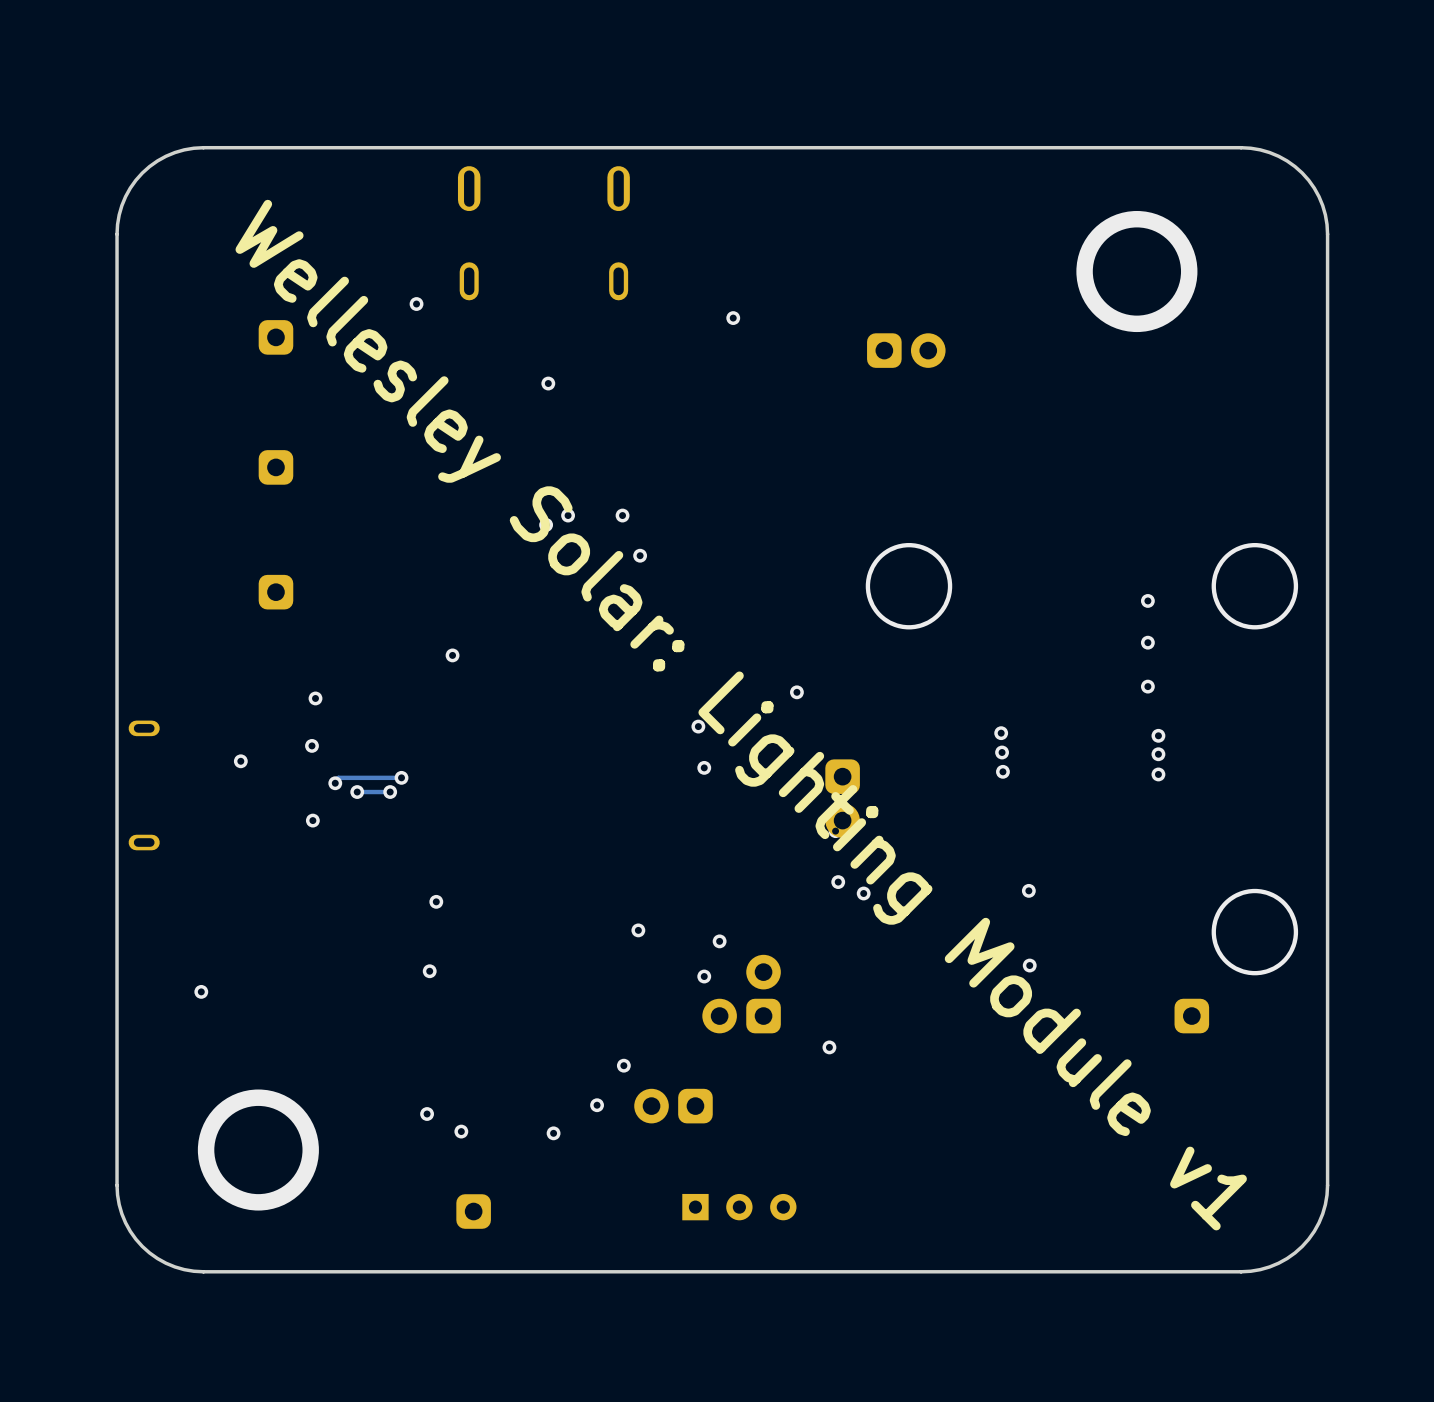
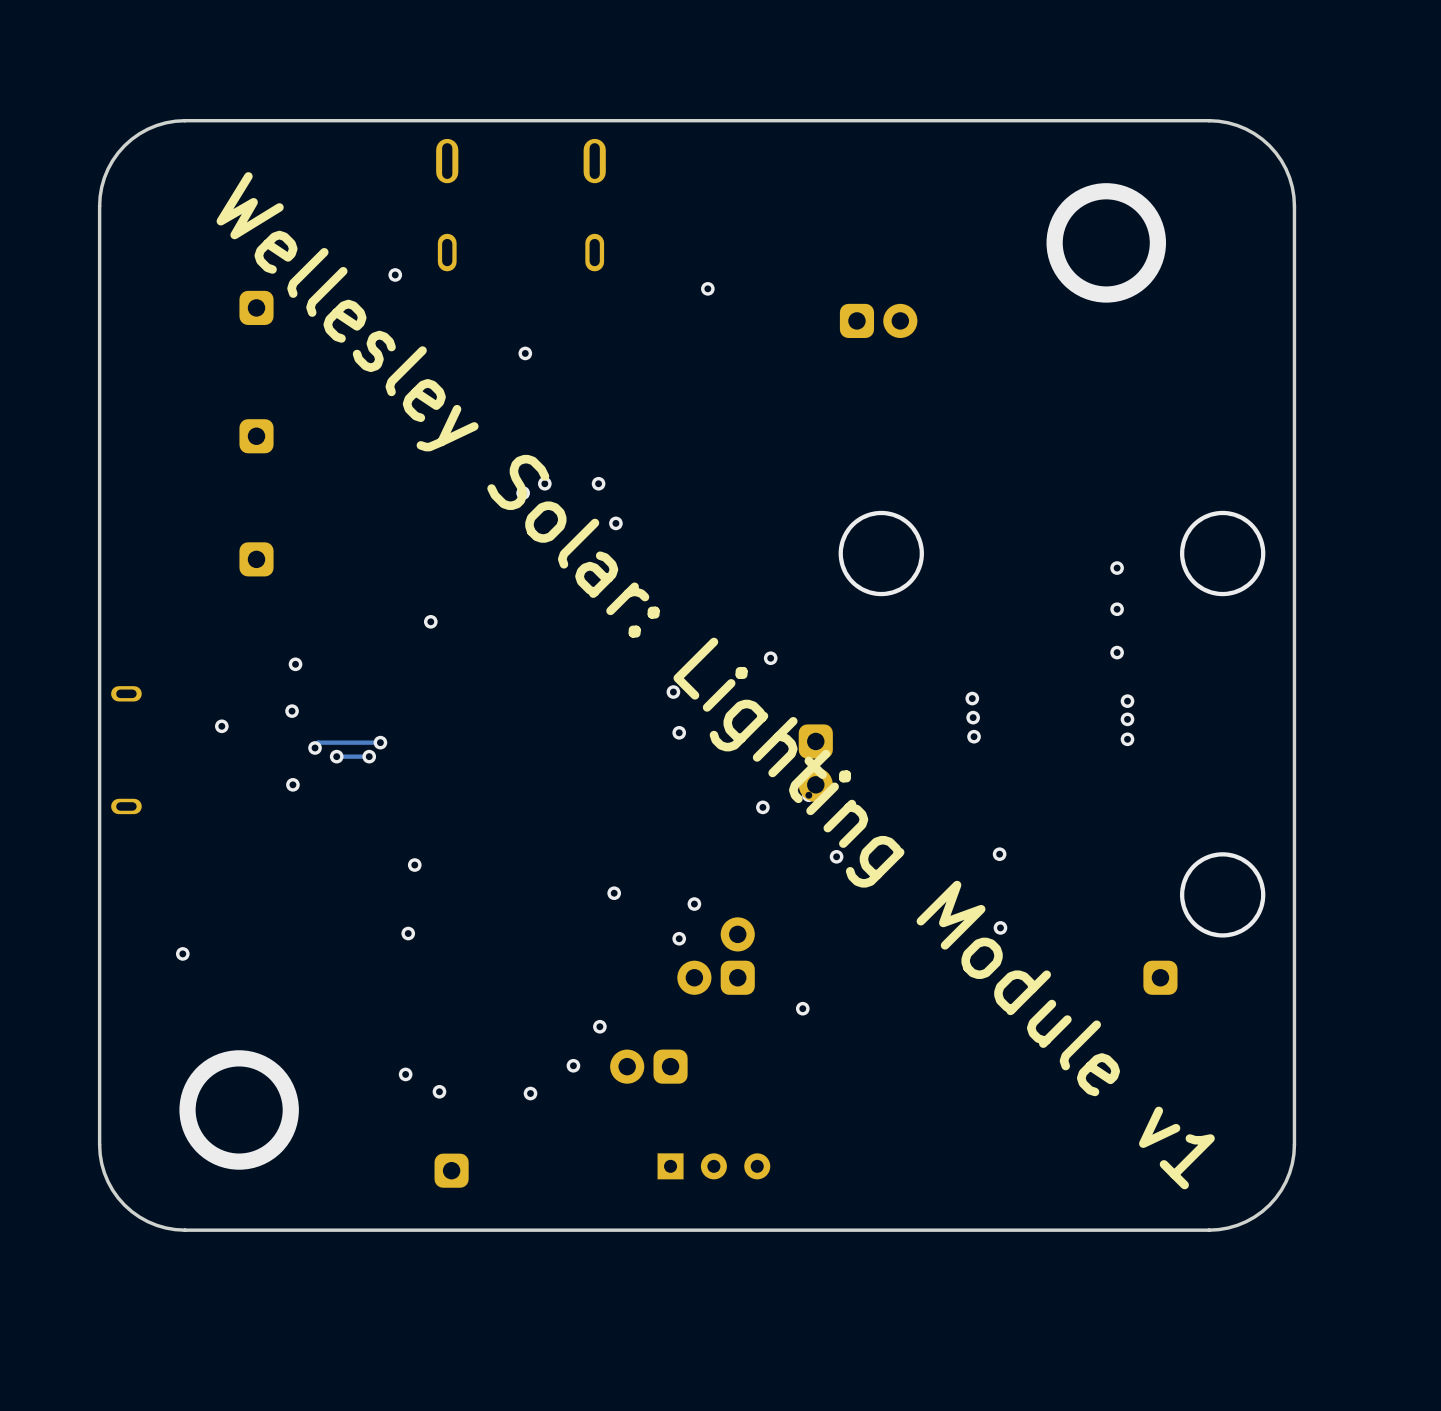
via position: (838, 882) -> (762, 807)

